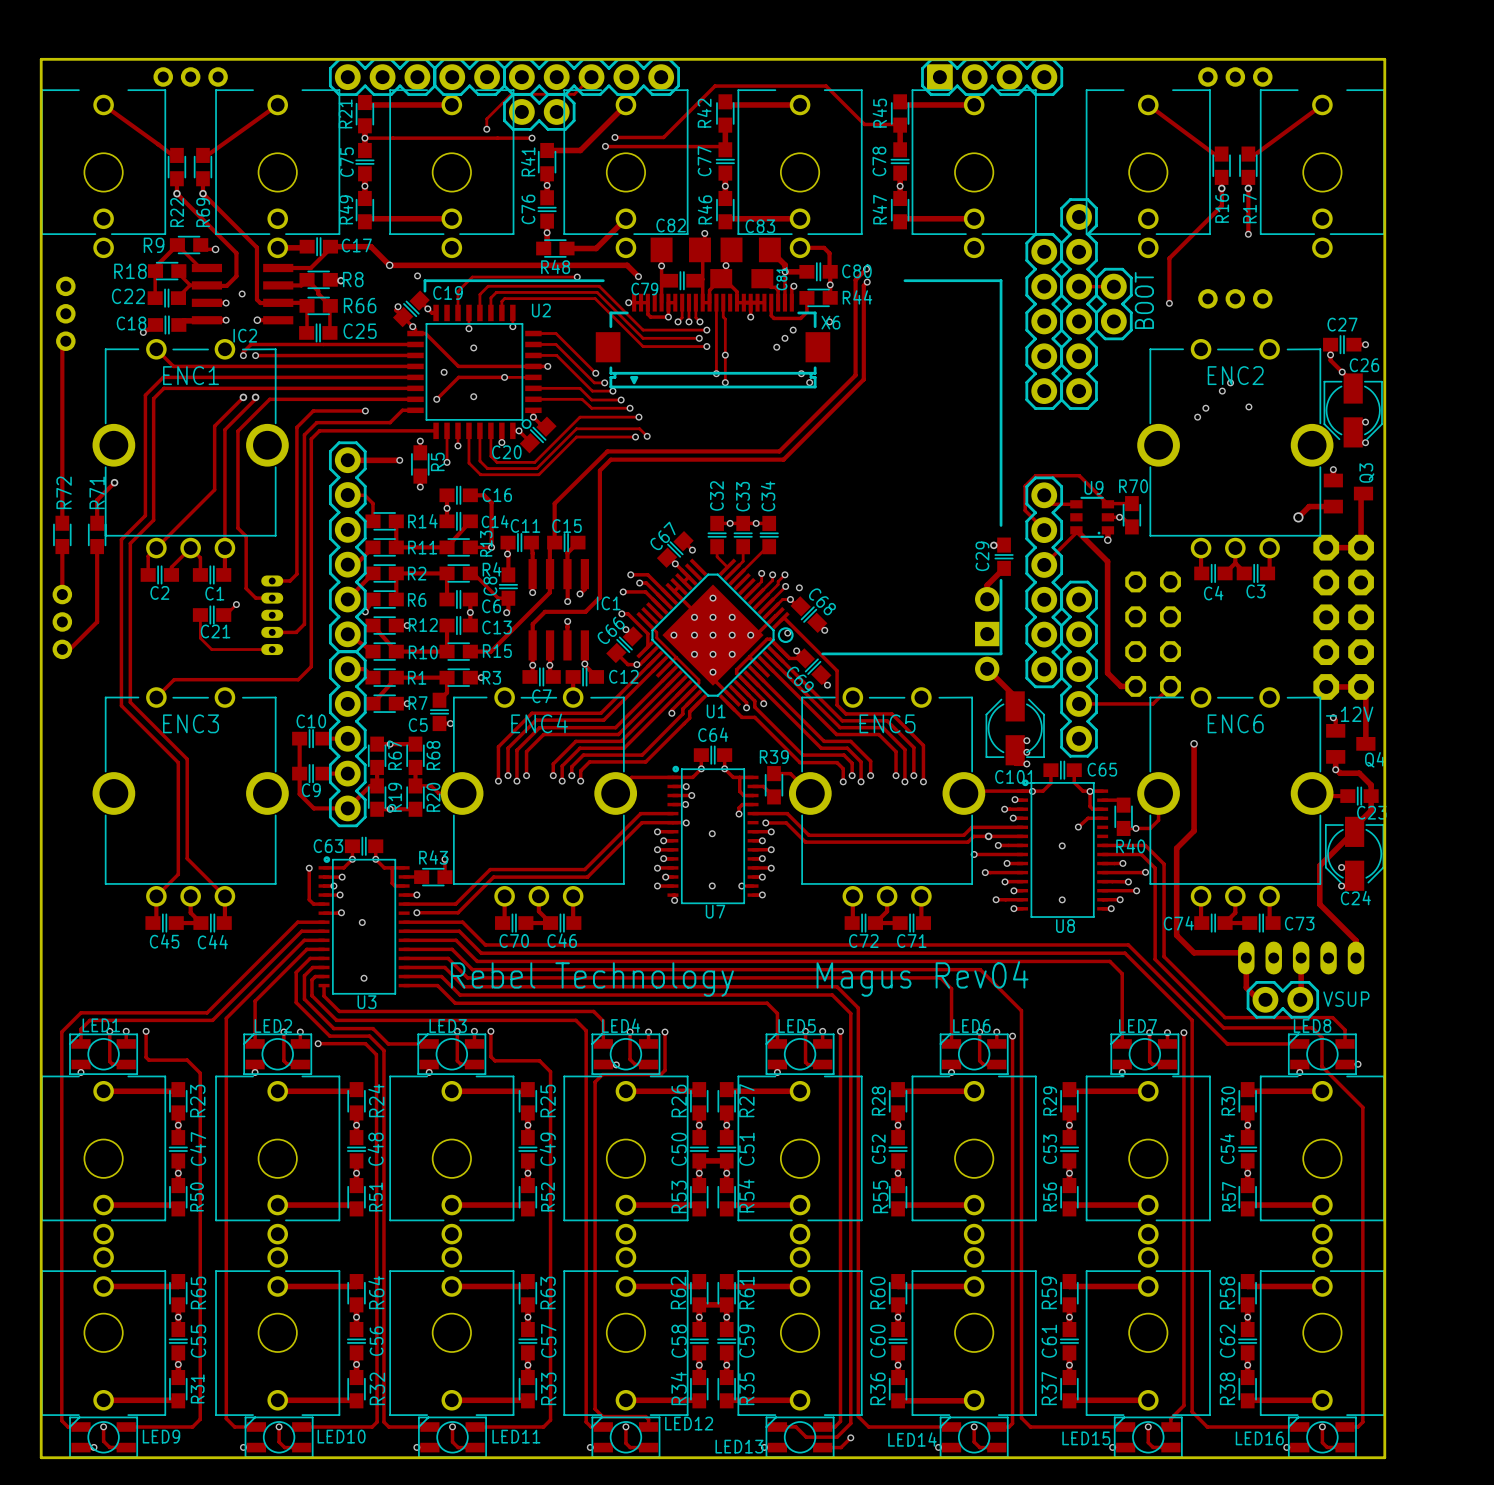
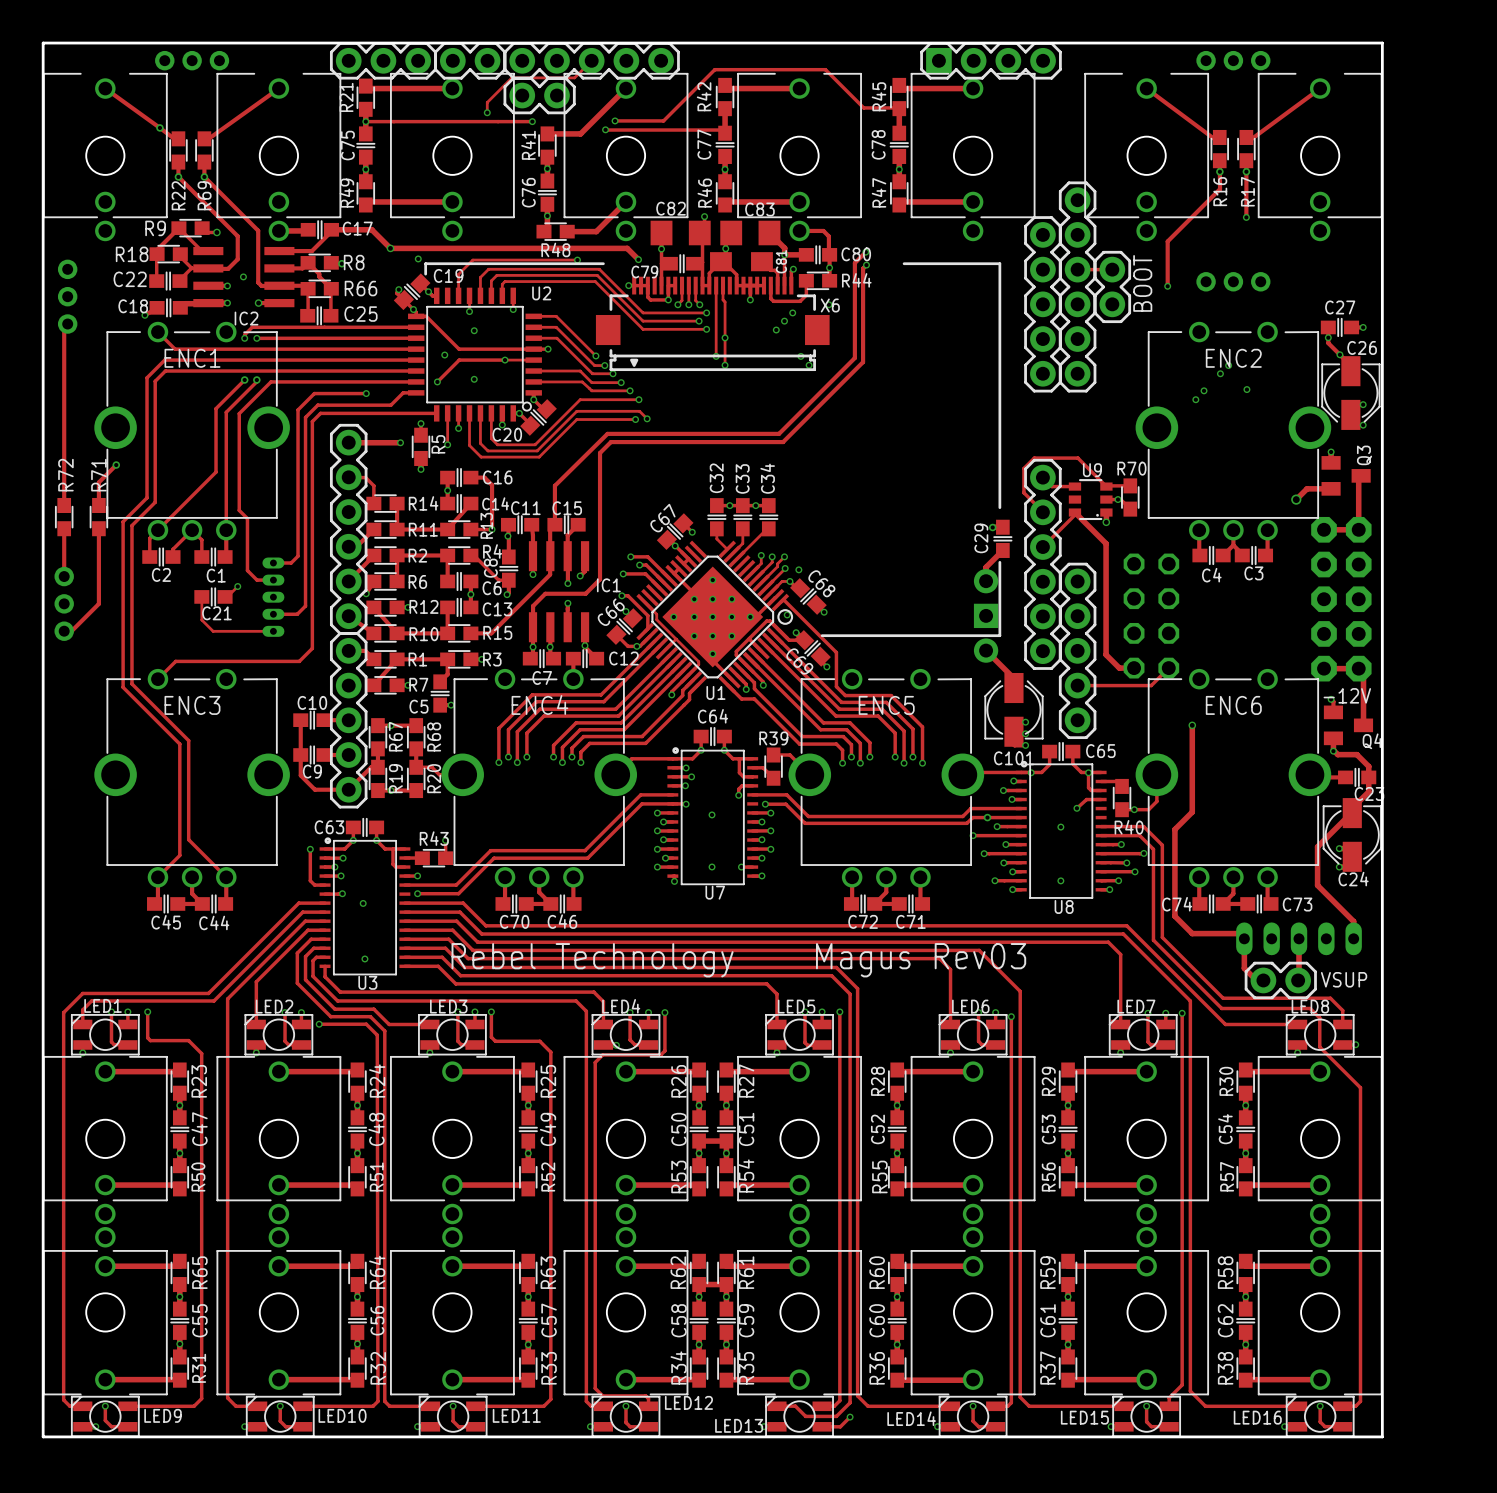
via: none -> (159, 127)
text: Magus Rev04 (922, 978) -> Magus Rev03 (921, 960)

